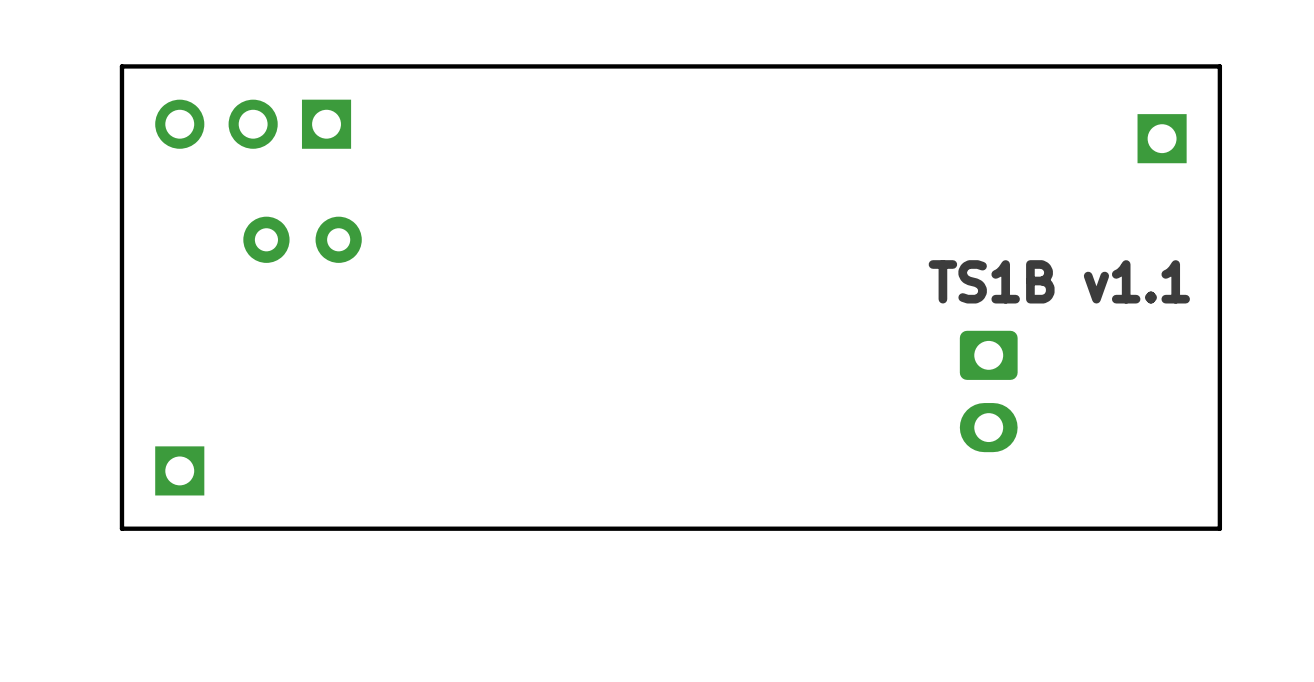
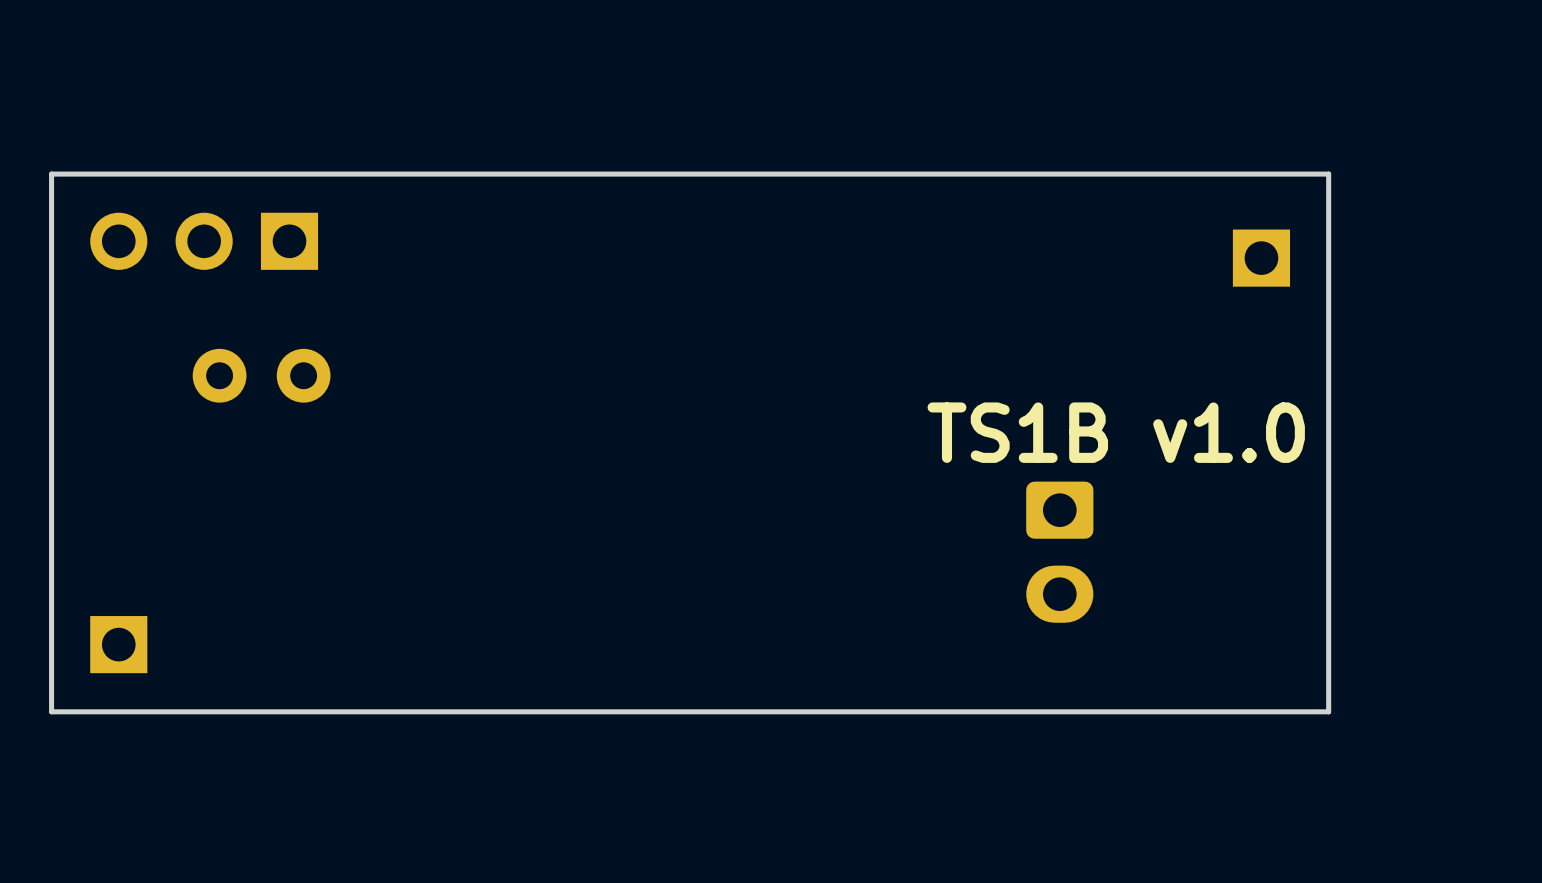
text: TS1B v1.1 (1059, 281) -> TS1B v1.0 (1116, 432)

